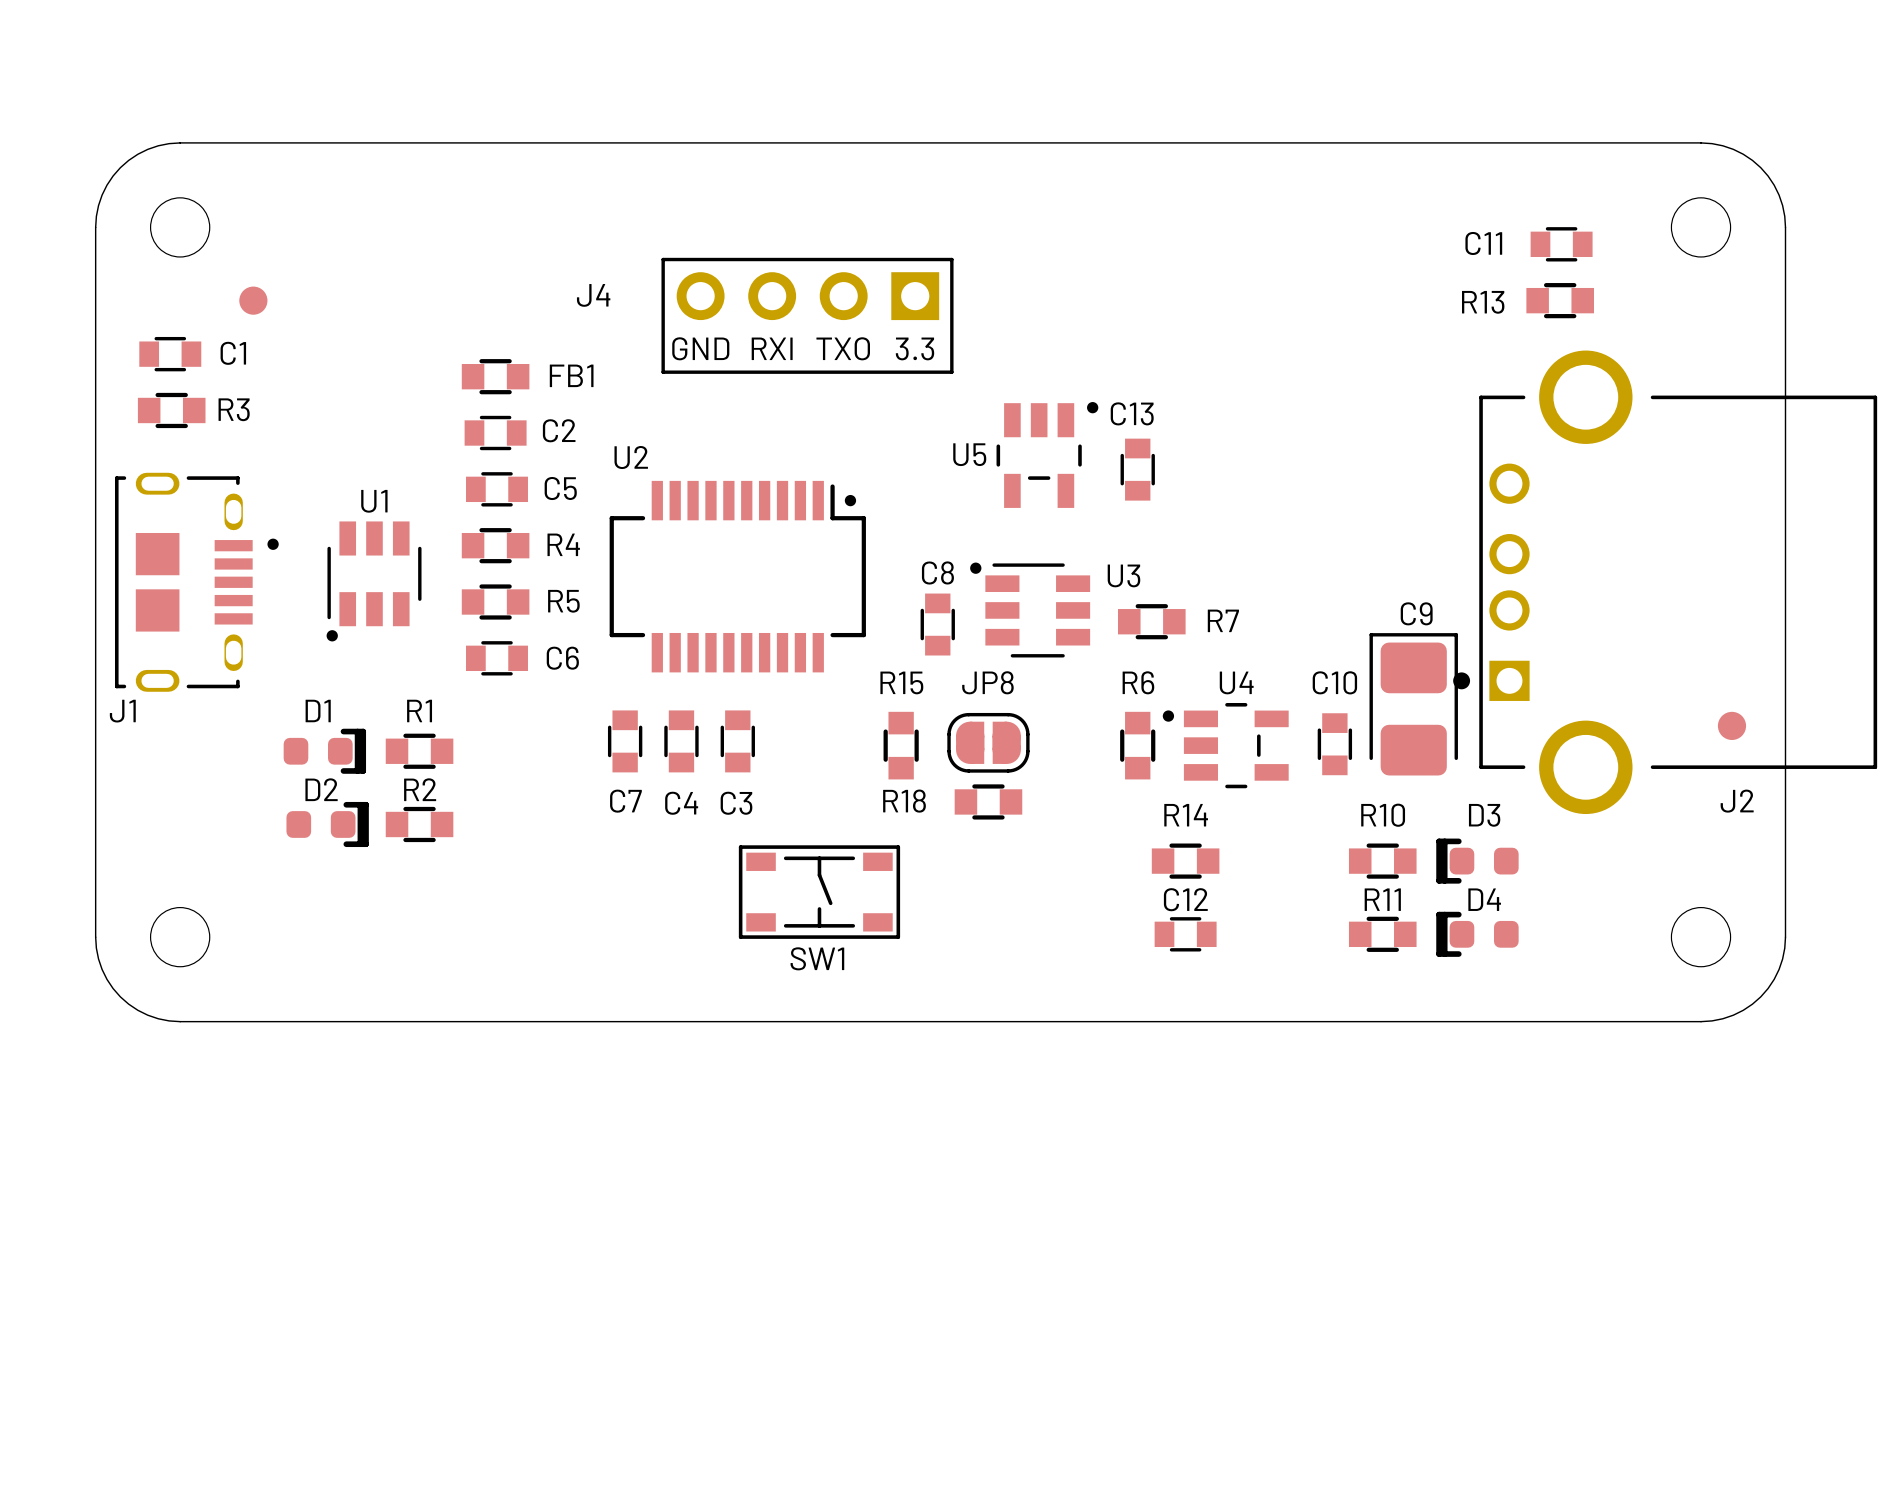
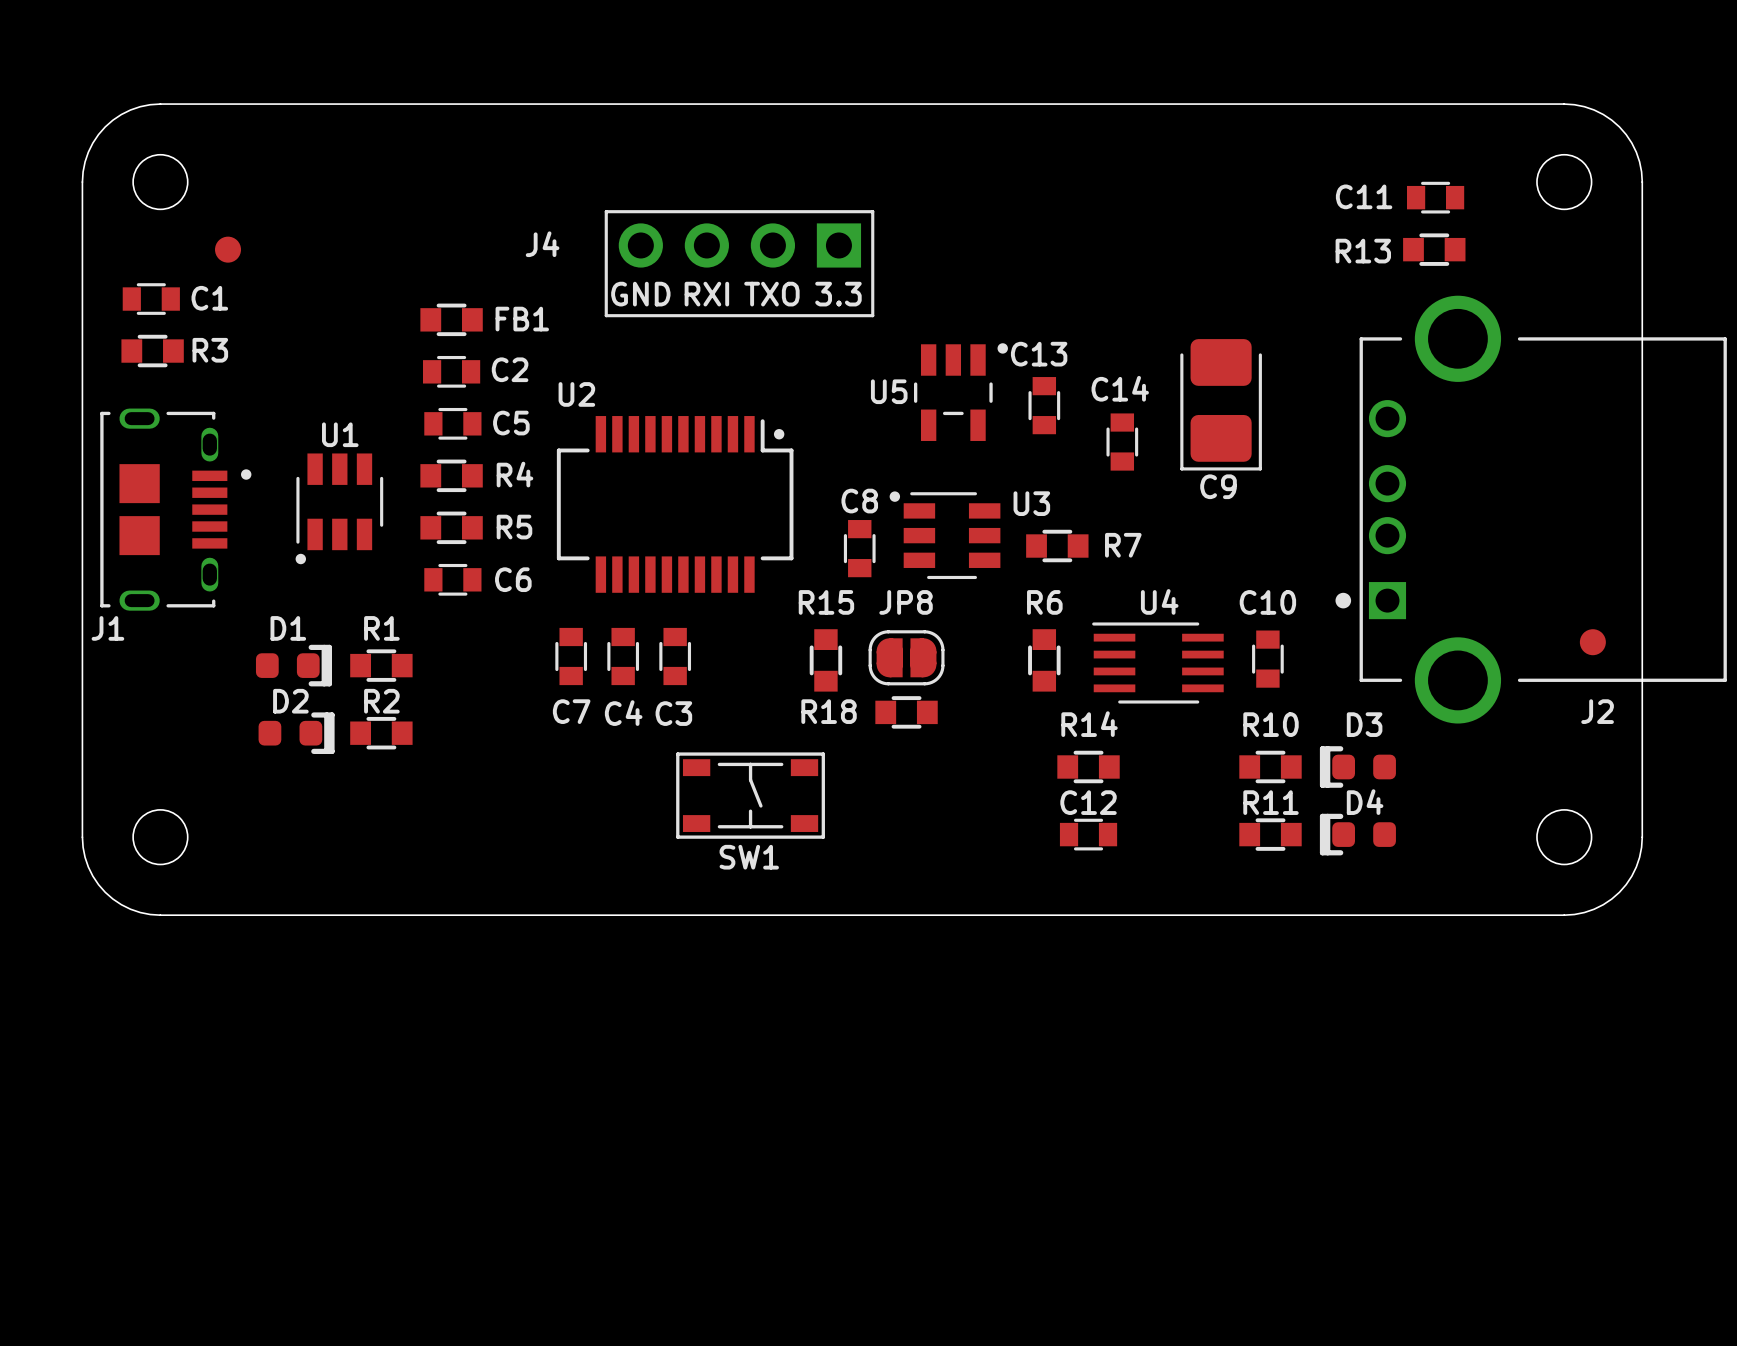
C14: none -> (1122, 442)
U4 footprint: [1162, 703, 1289, 789] -> [1092, 622, 1224, 704]
C9 rotation: 0° (1413, 704) -> 180° (1221, 404)
C9 position: (1413, 704) -> (1221, 404)
C10 position: (1334, 744) -> (1267, 659)

